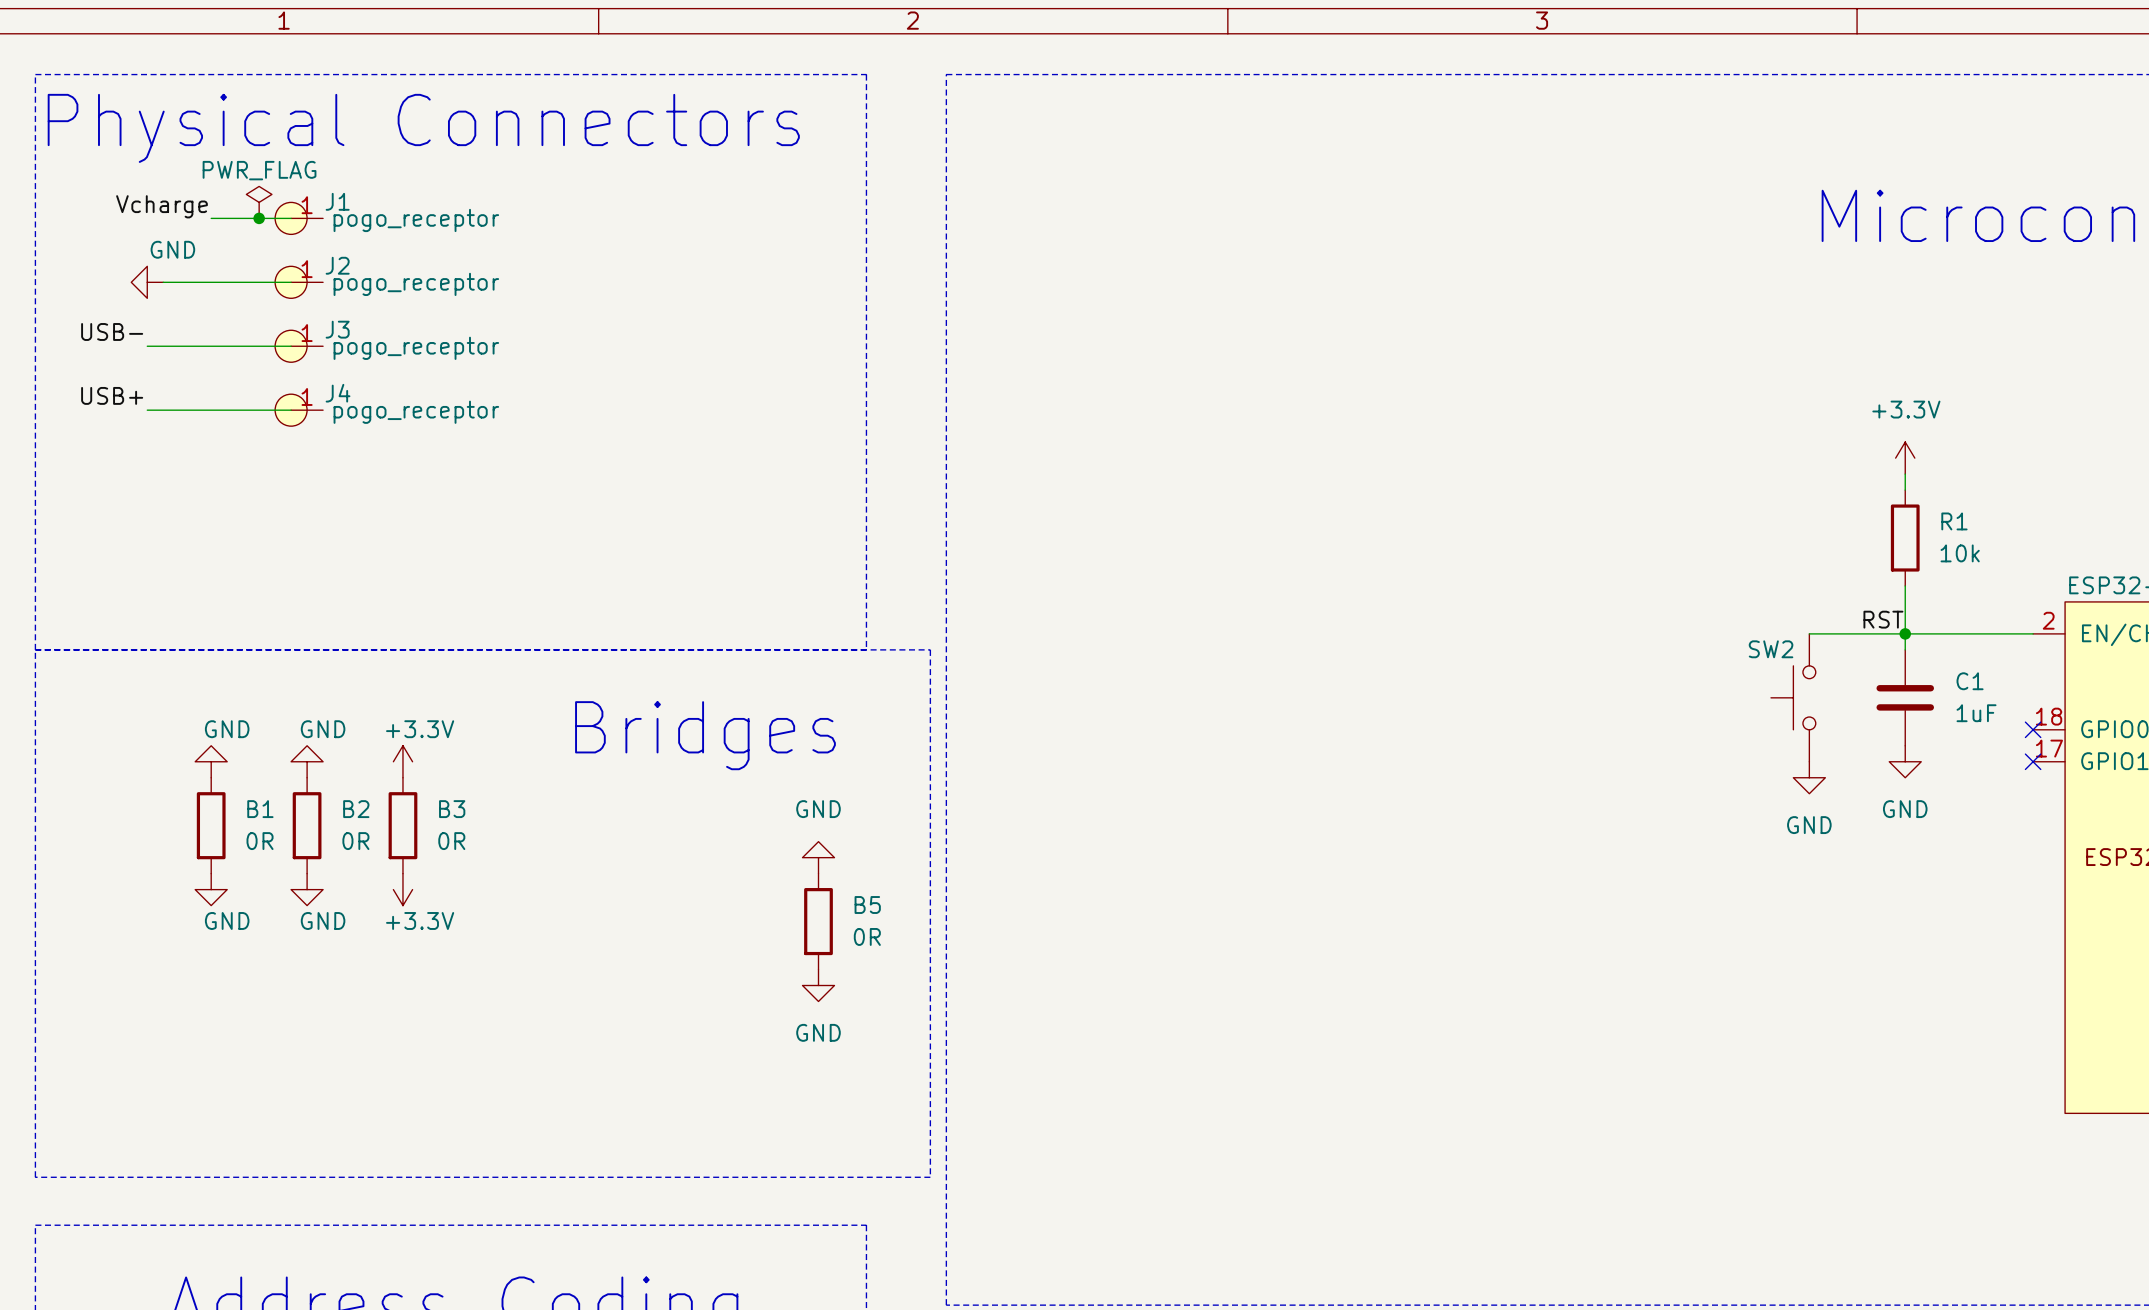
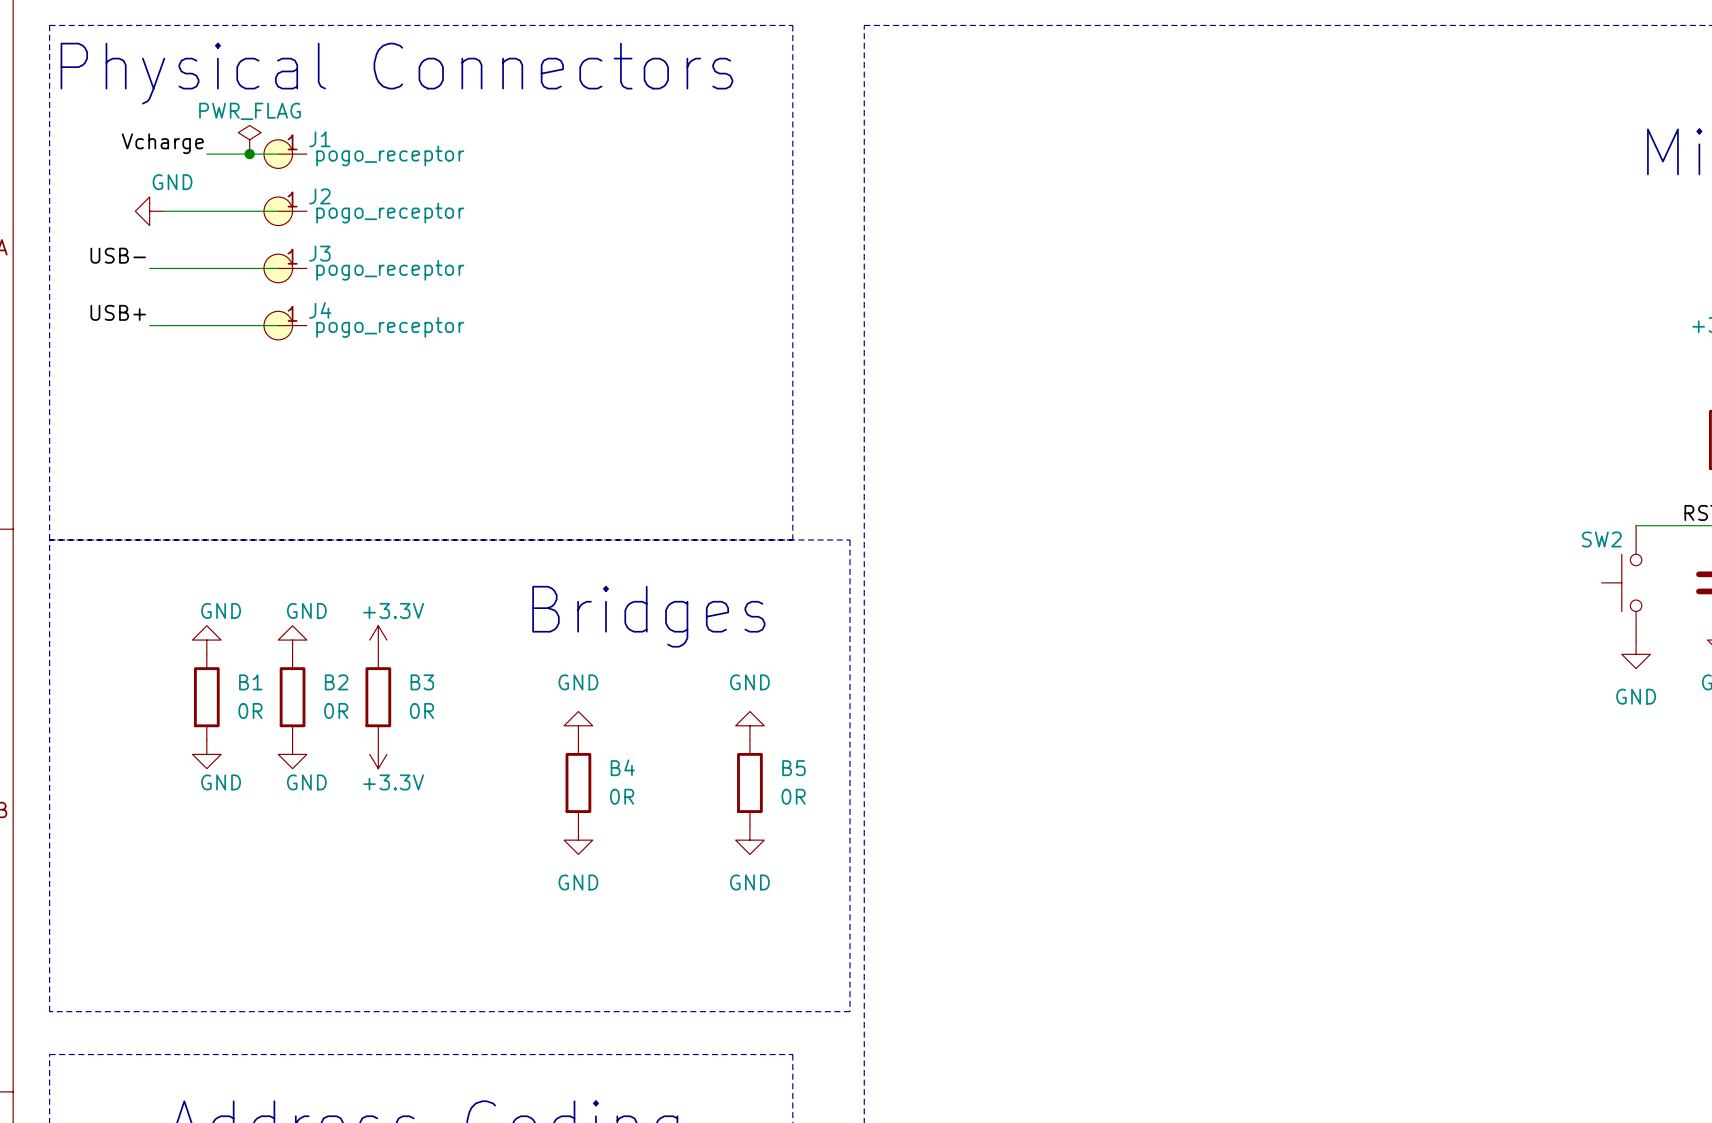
power symbol: none -> GND (578, 725)
B4: none -> 0R (578, 782)
power symbol: none -> GND (578, 840)

